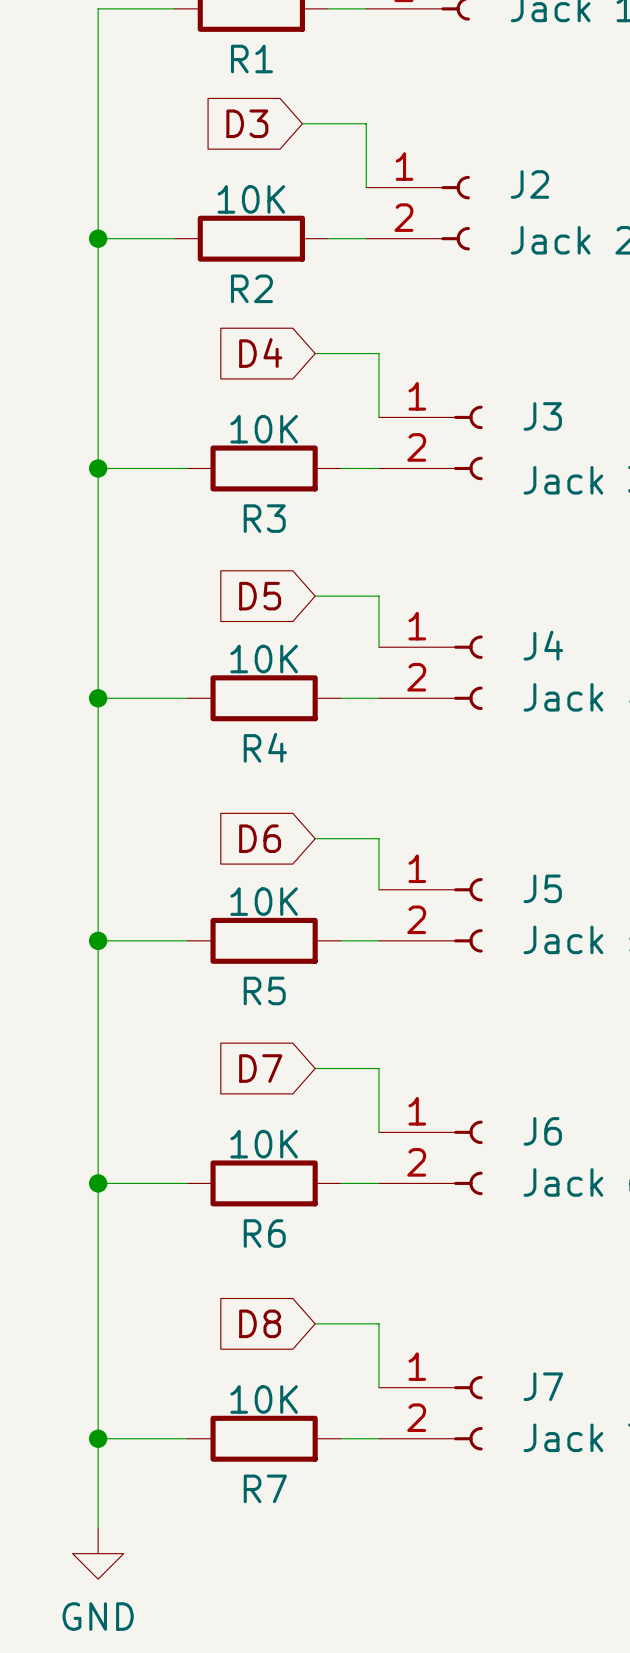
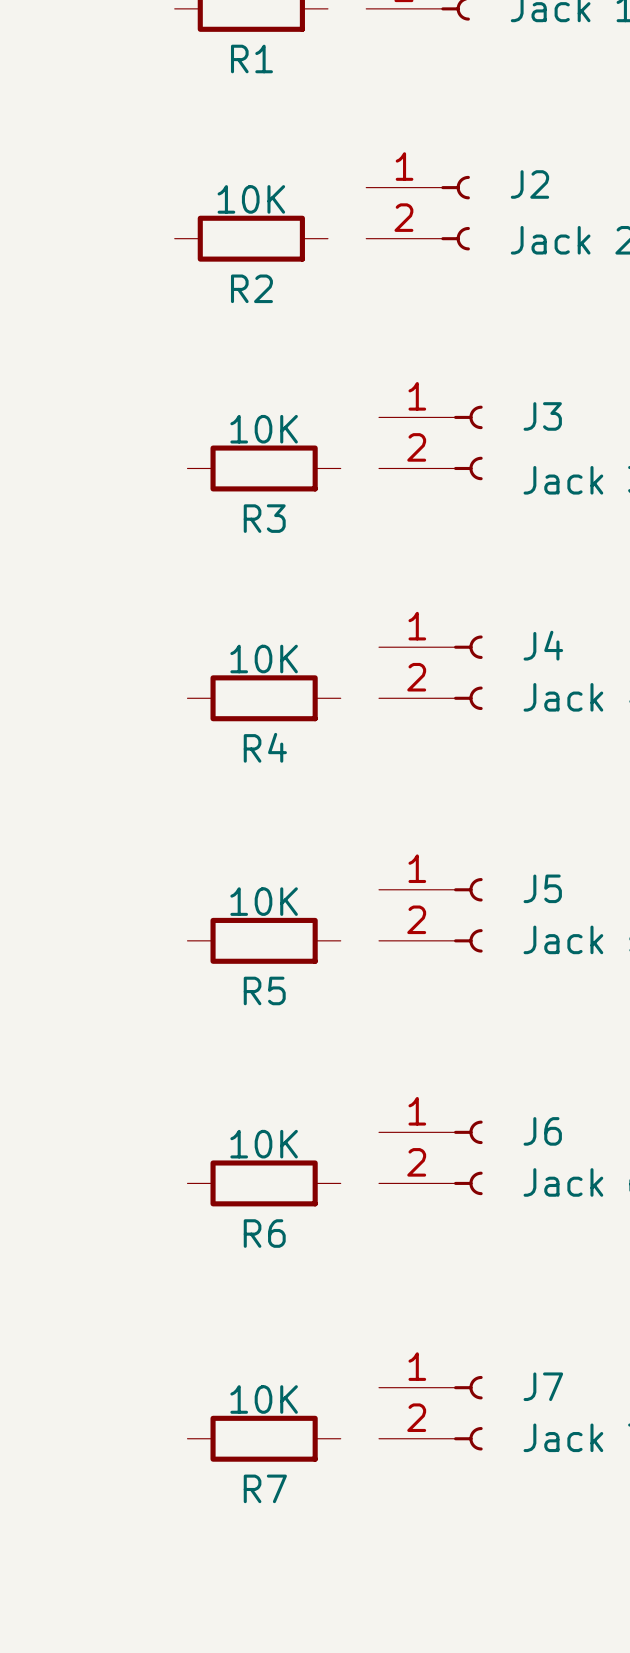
wire: (174, 8) (98, 8) (98, 1528) -> none
wire: (327, 8) (366, 8) -> none
global label: D3 (247, 123) -> none
wire: (302, 123) (366, 123) (366, 187) -> none
wire: (98, 238) (174, 238) -> none
junction: (98, 238) -> none
wire: (327, 238) (366, 238) -> none
global label: D4 (260, 352) -> none
wire: (315, 353) (379, 353) (379, 417) -> none
wire: (98, 468) (187, 468) -> none
junction: (98, 468) -> none
wire: (340, 468) (379, 468) -> none
global label: D5 (260, 596) -> none
wire: (315, 596) (379, 596) (379, 647) -> none
wire: (98, 698) (187, 698) -> none
junction: (98, 698) -> none
wire: (340, 698) (379, 698) -> none
global label: D6 (260, 838) -> none
wire: (315, 838) (379, 838) (379, 889) -> none
wire: (98, 940) (187, 940) -> none
junction: (98, 940) -> none
wire: (340, 940) (379, 940) -> none
global label: D7 (260, 1068) -> none
wire: (315, 1068) (379, 1068) (379, 1132) -> none
wire: (98, 1183) (187, 1183) -> none
junction: (98, 1183) -> none
wire: (340, 1183) (379, 1183) -> none
global label: D8 (260, 1323) -> none
wire: (315, 1323) (379, 1323) (379, 1387) -> none
wire: (98, 1438) (187, 1438) -> none
junction: (98, 1438) -> none
wire: (340, 1438) (379, 1438) -> none
power symbol: GND (98, 1553) -> none

